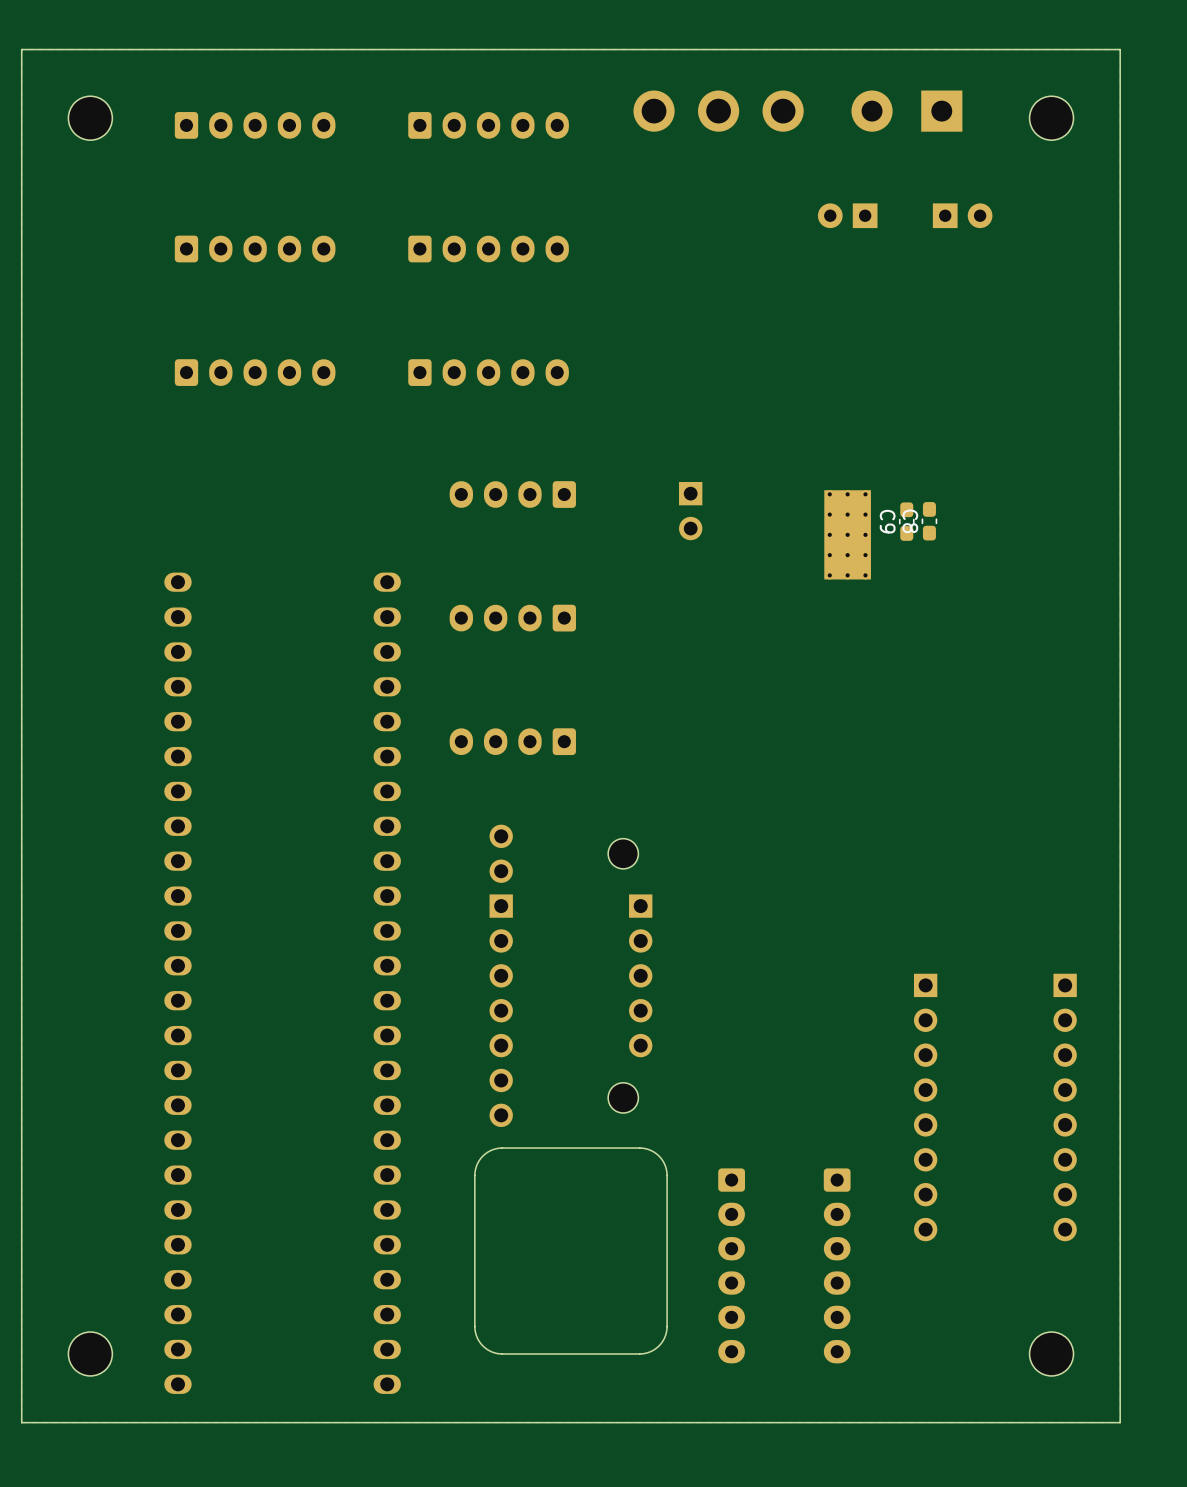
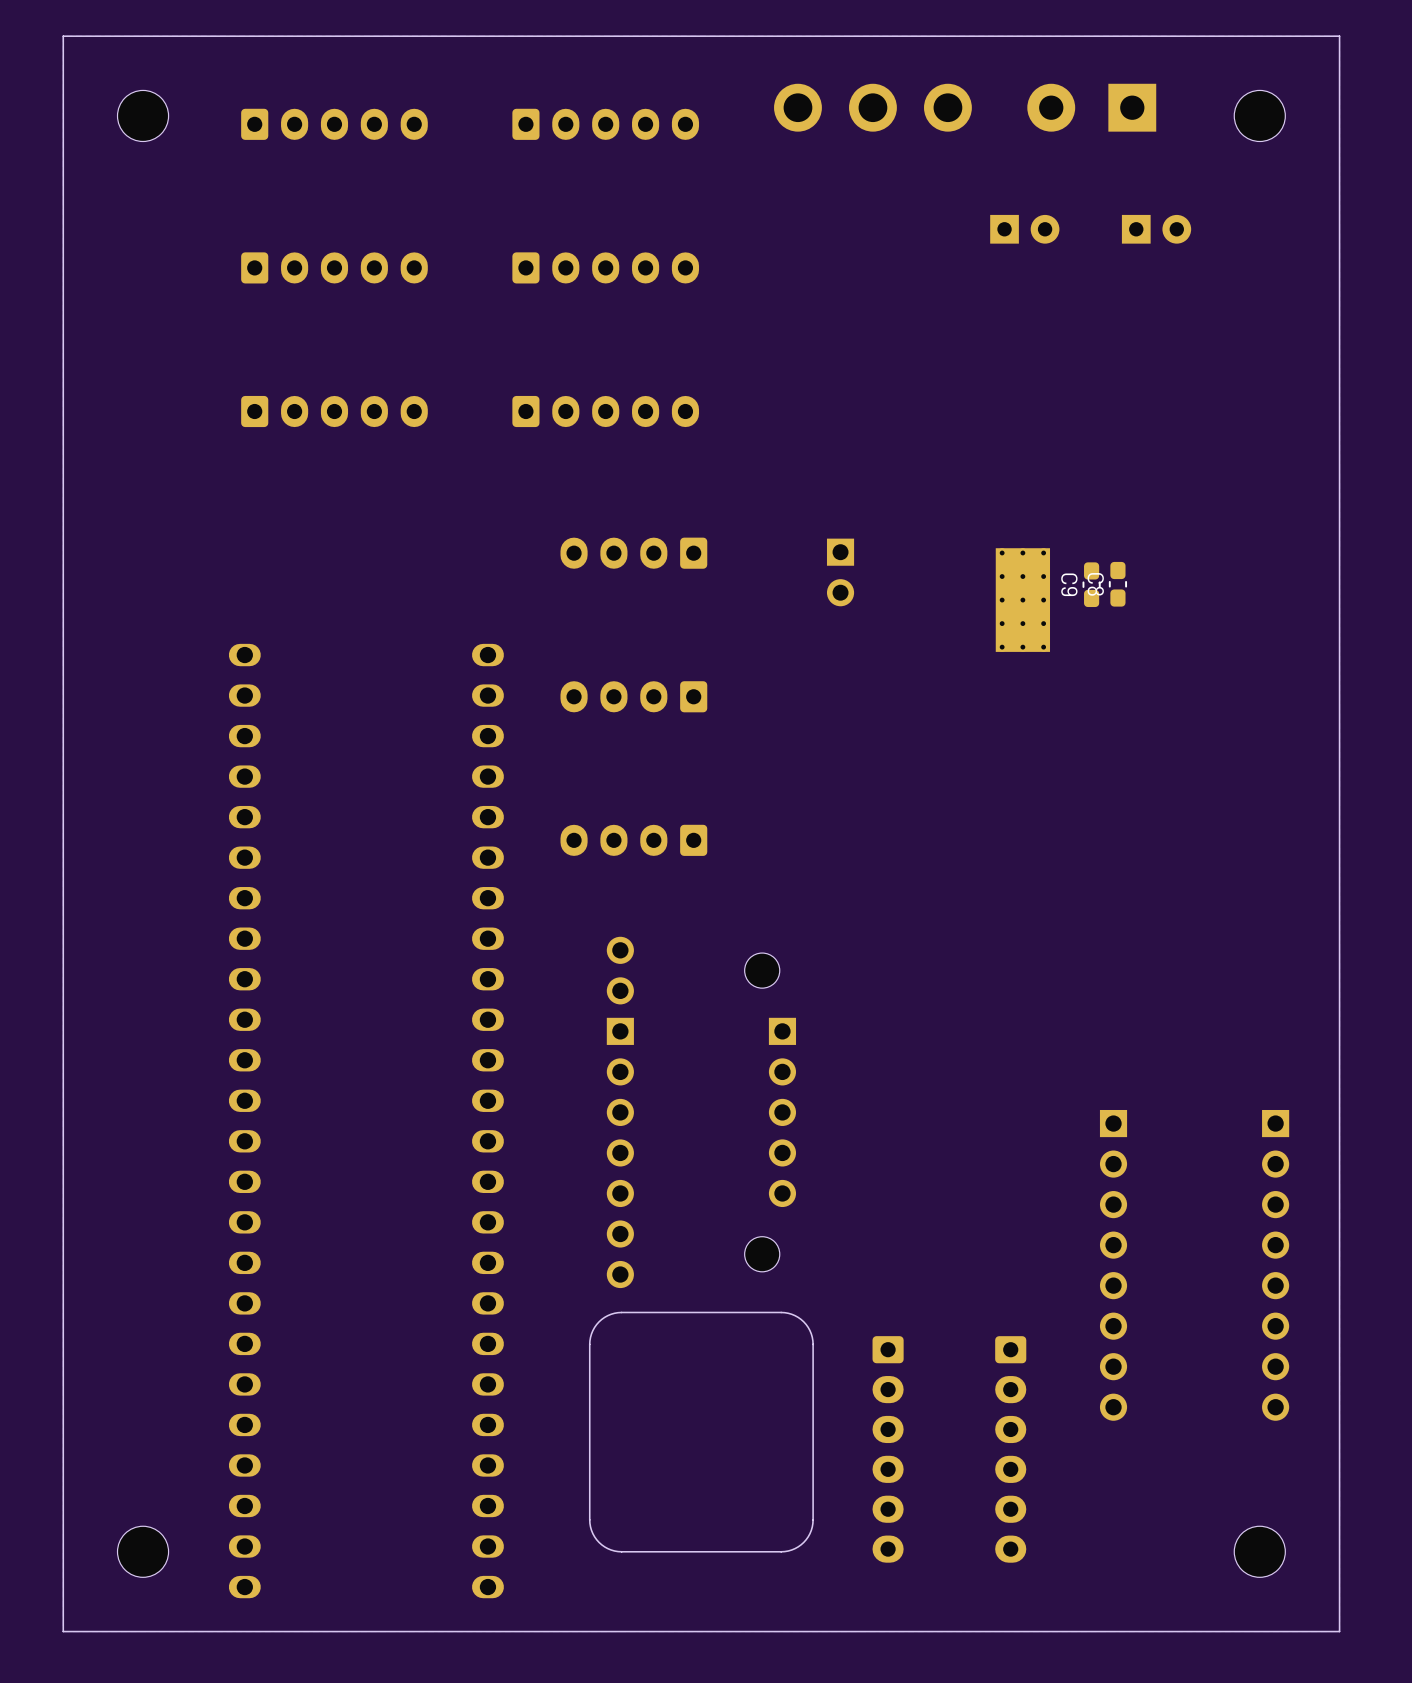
part rotation: 0° (847, 215) -> 180° (1024, 229)

